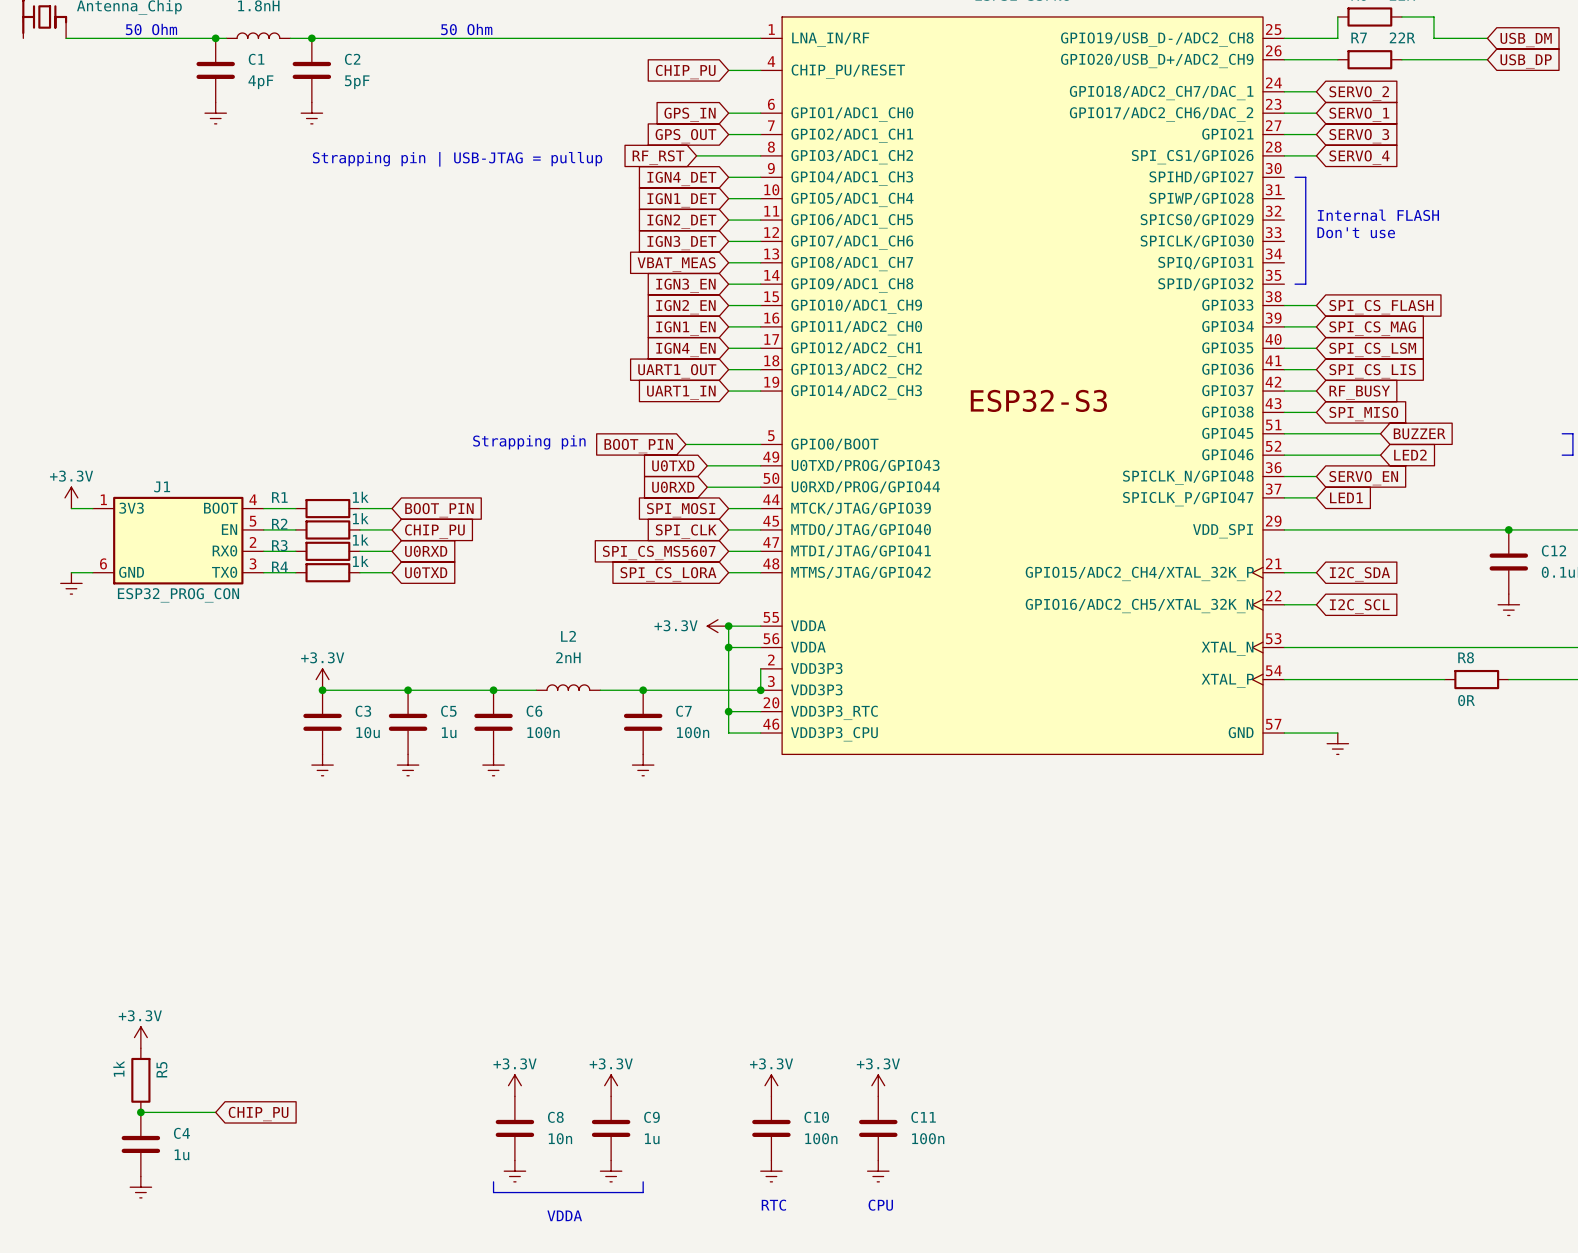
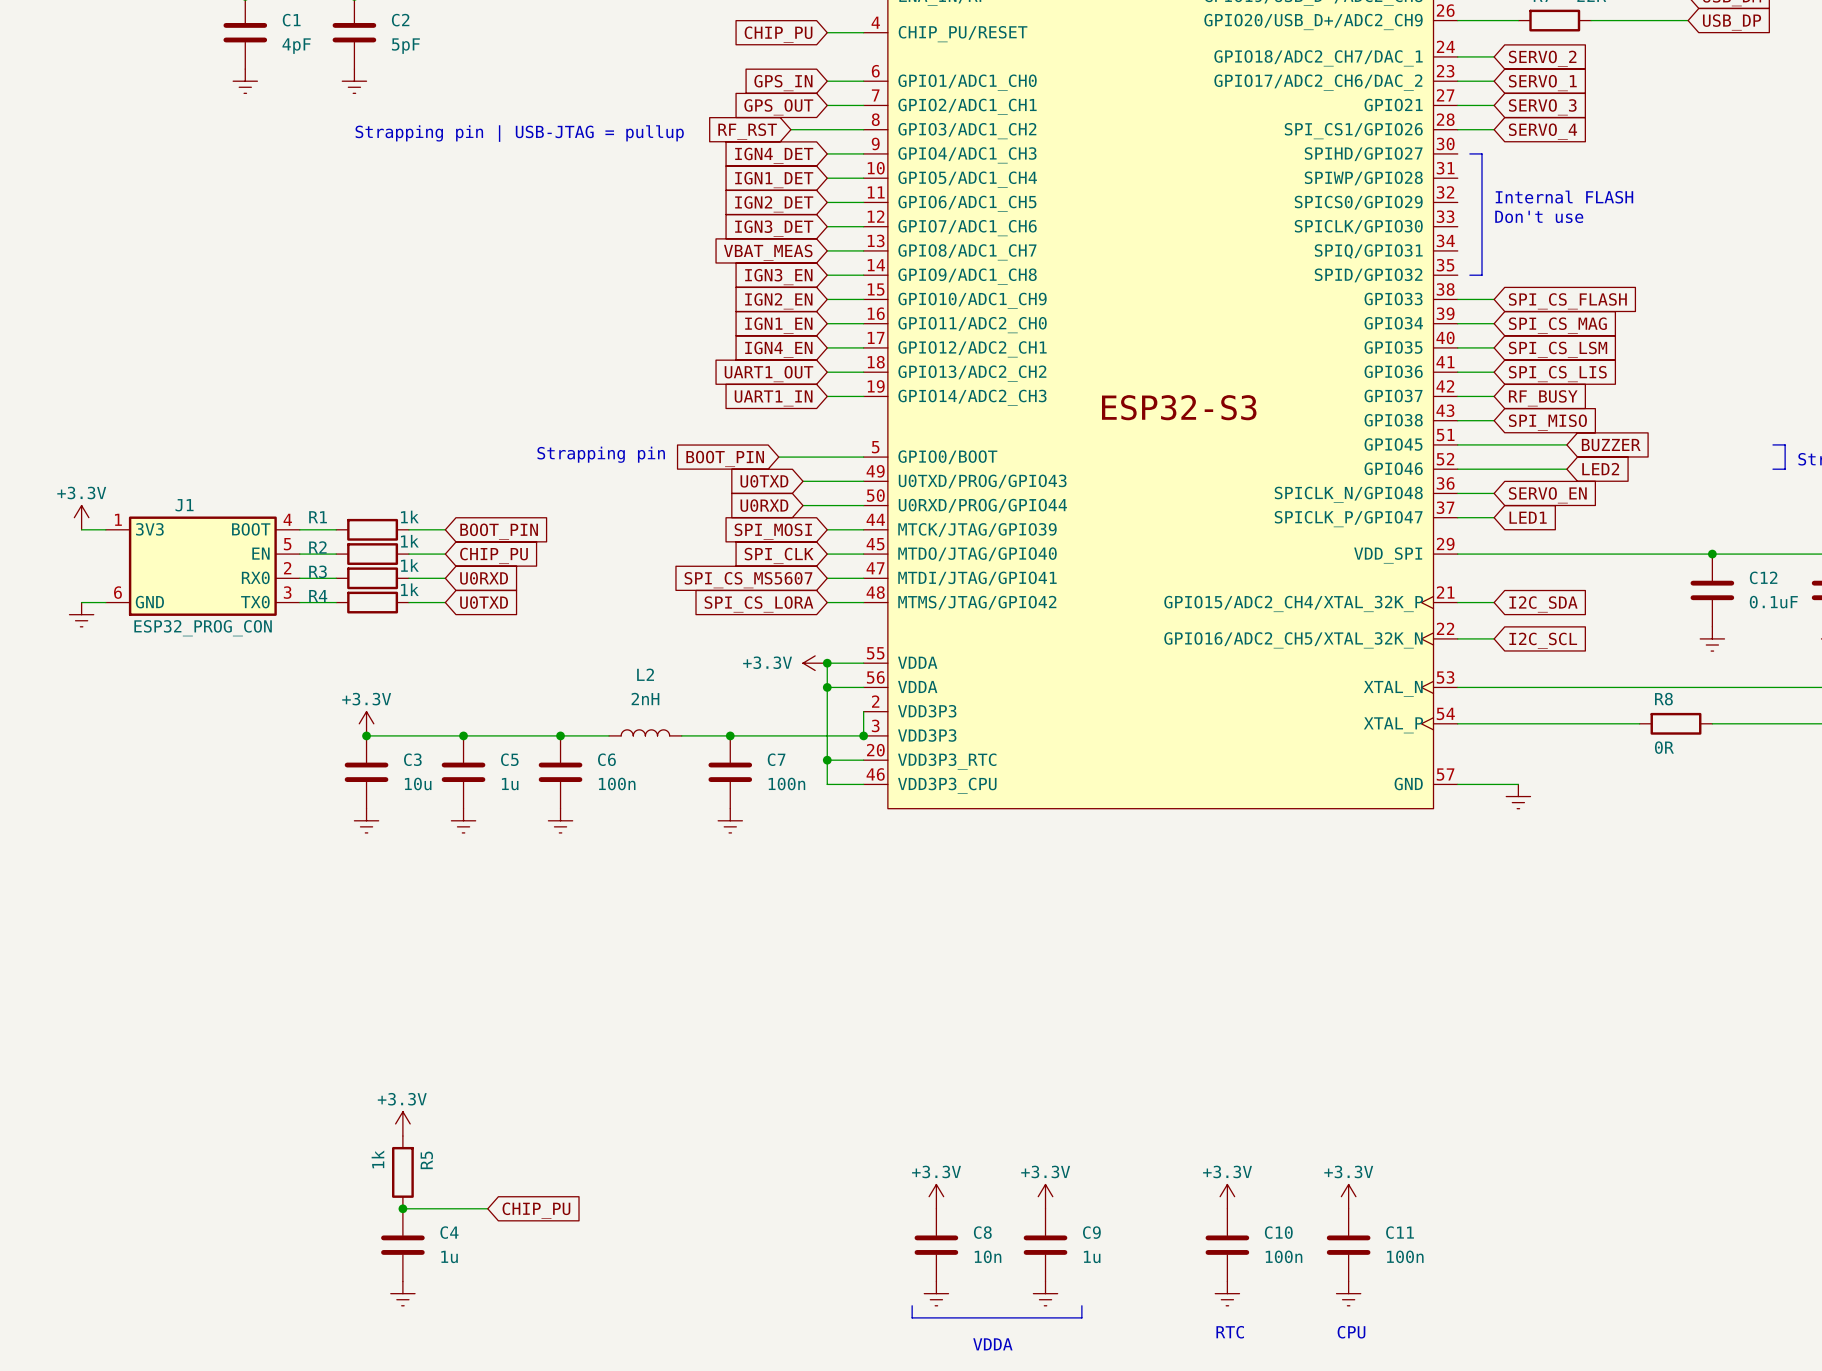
power symbol: none -> +3.3V (402, 1123)
power symbol: +3.3V (140, 1037) -> none
R5 position: (140, 1080) -> (402, 1172)
power symbol: +3.3V (514, 1085) -> none
power symbol: +3.3V (611, 1085) -> none
power symbol: +3.3V (771, 1085) -> none
power symbol: +3.3V (878, 1085) -> none
power symbol: none -> +3.3V (936, 1196)
power symbol: none -> +3.3V (1045, 1196)
power symbol: none -> +3.3V (1227, 1196)
power symbol: none -> +3.3V (1348, 1196)
wire: none -> (402, 1208) (487, 1208)
junction: none -> (402, 1208)
global label: none -> CHIP_PU (536, 1210)
wire: (140, 1112) (215, 1112) -> none
junction: (140, 1112) -> none
global label: CHIP_PU (258, 1114) -> none
C8 position: (514, 1128) -> (936, 1245)
C9 position: (611, 1128) -> (1045, 1245)
C10 position: (771, 1128) -> (1227, 1245)
C11 position: (878, 1128) -> (1348, 1245)
C4 position: (140, 1144) -> (402, 1245)
power symbol: (514, 1171) -> none
power symbol: (611, 1171) -> none
power symbol: (771, 1171) -> none
power symbol: (878, 1171) -> none
power symbol: none -> (402, 1293)
line: (493, 1181) (493, 1192) (643, 1192) (643, 1181) -> none
power symbol: none -> (936, 1293)
power symbol: none -> (1045, 1293)
power symbol: none -> (1227, 1293)
power symbol: none -> (1348, 1293)
power symbol: (140, 1187) -> none
line: none -> (912, 1305) (912, 1317) (1081, 1317) (1081, 1305)
text: RTC (773, 1205) -> none
text: CPU (880, 1205) -> none
text: VDDA (564, 1215) -> none
text: none -> RTC (1230, 1332)
text: none -> CPU (1351, 1332)
text: none -> VDDA (992, 1344)

